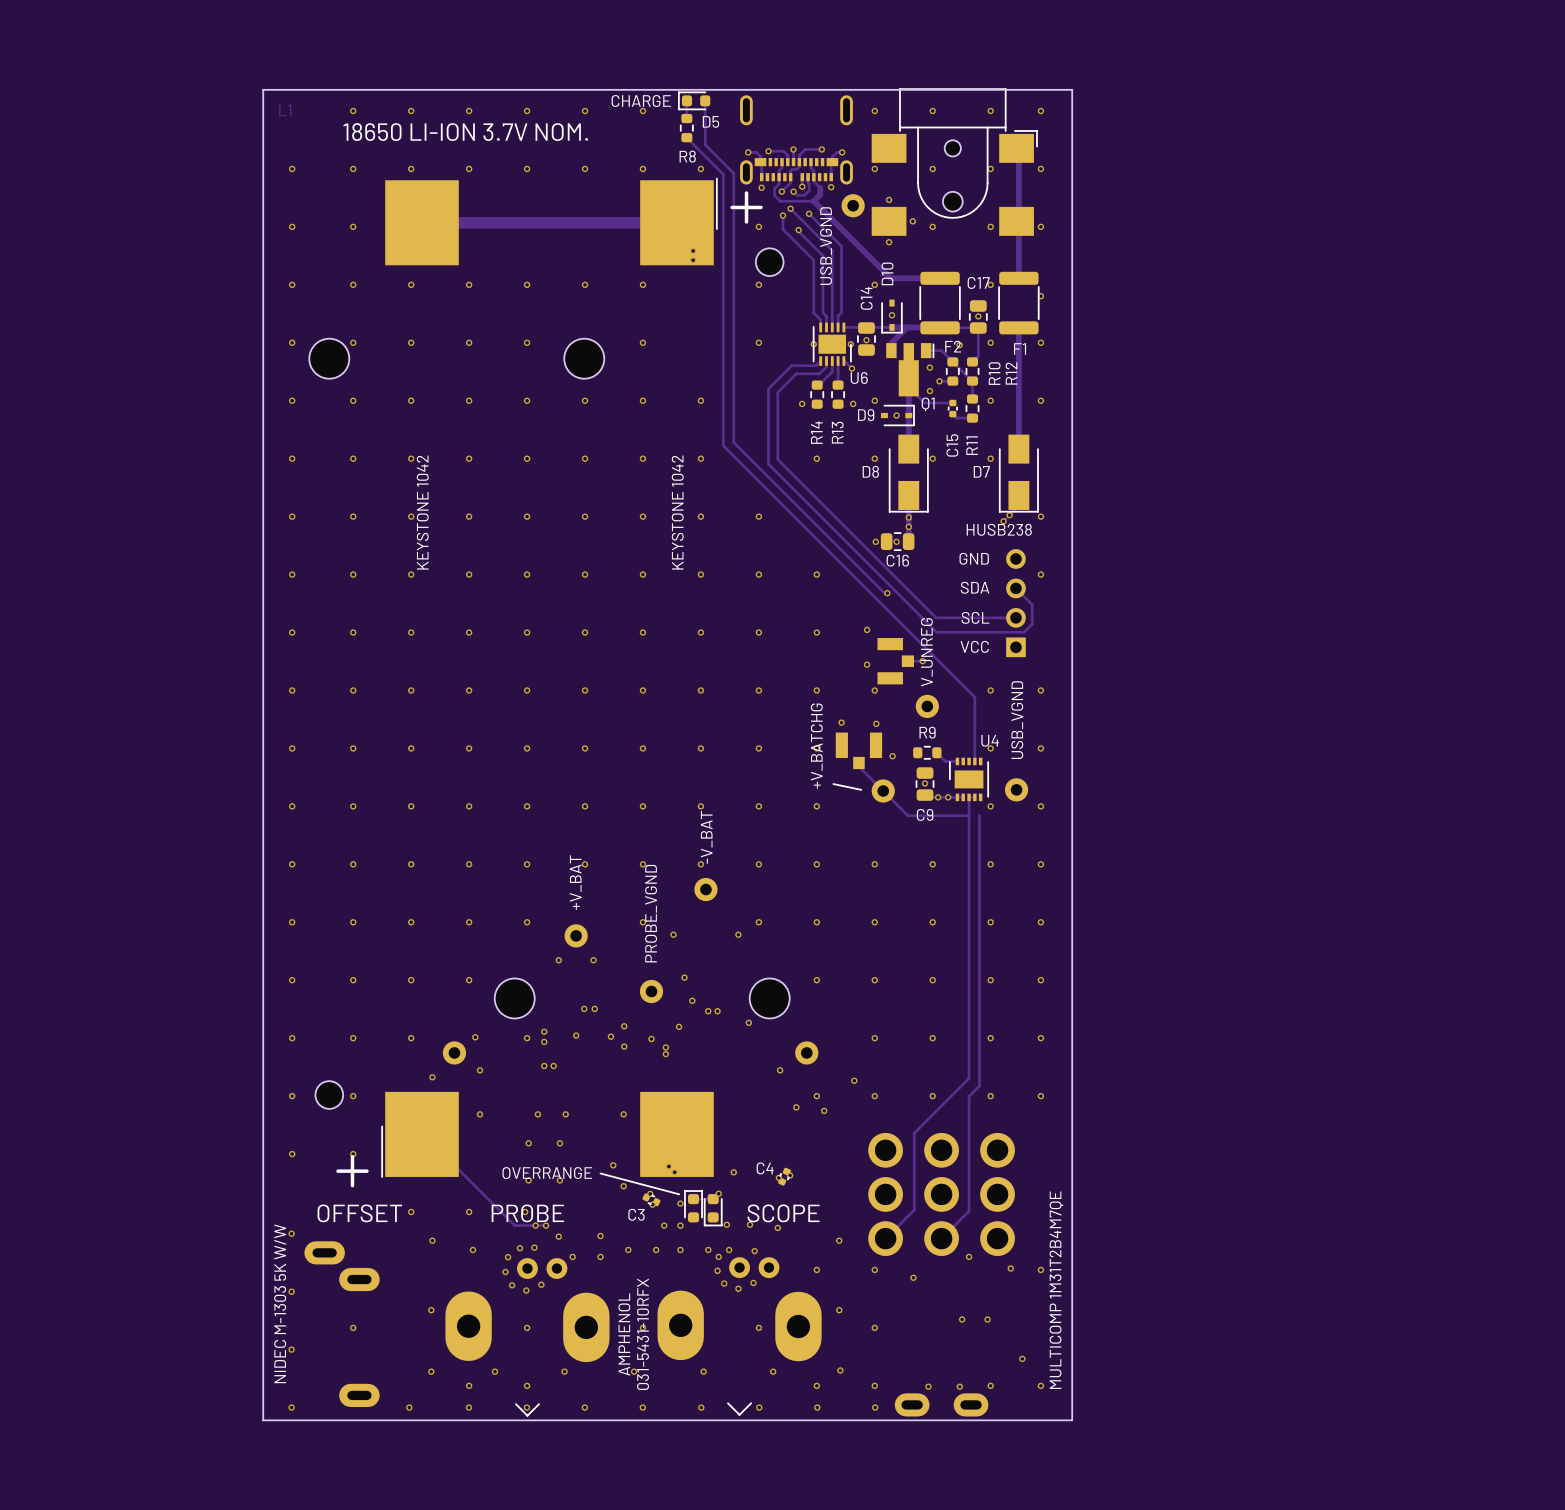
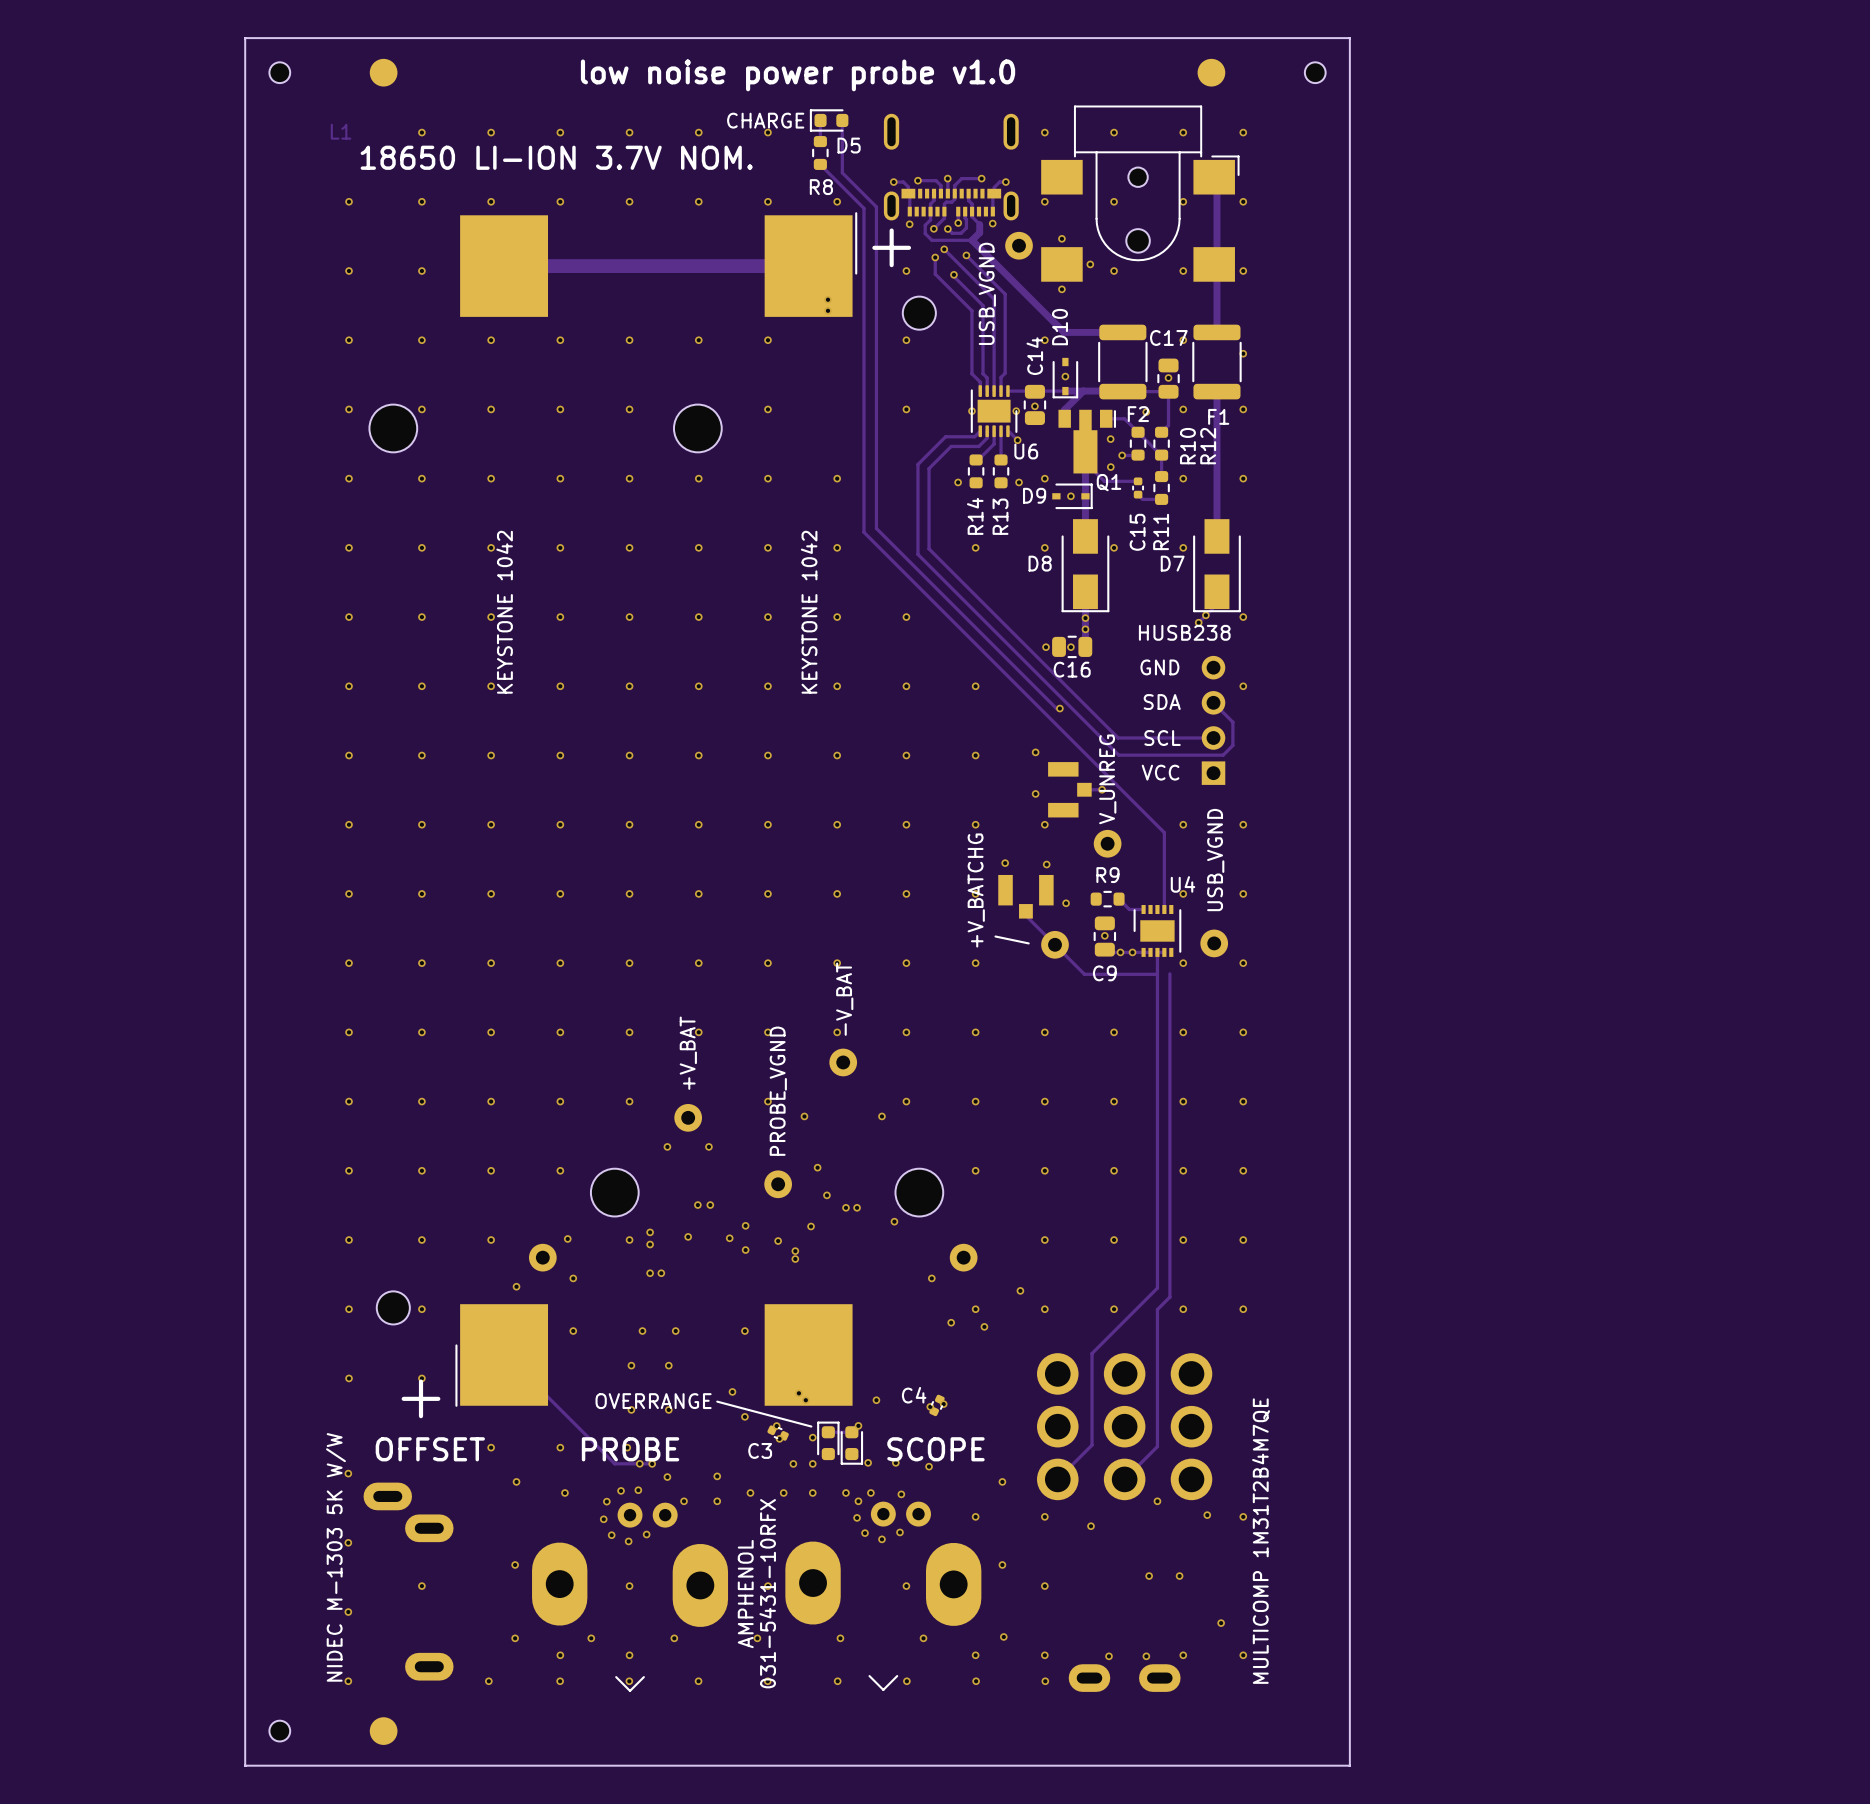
board edge: none -> (245, 38) (1349, 38)
board edge: none -> (245, 38) (245, 1765)
board edge: none -> (1349, 38) (1349, 1765)
part: none -> (279, 72)
part: none -> (383, 72)
part: none -> (1211, 72)
part: none -> (1315, 72)
text: none -> low noise power probe v1.0 (798, 75)
board edge: (263, 89) (1072, 89) (1072, 1420) (263, 1420) (263, 89) -> none
part: none -> (279, 1731)
part: none -> (383, 1731)
board edge: none -> (245, 1765) (1349, 1765)

